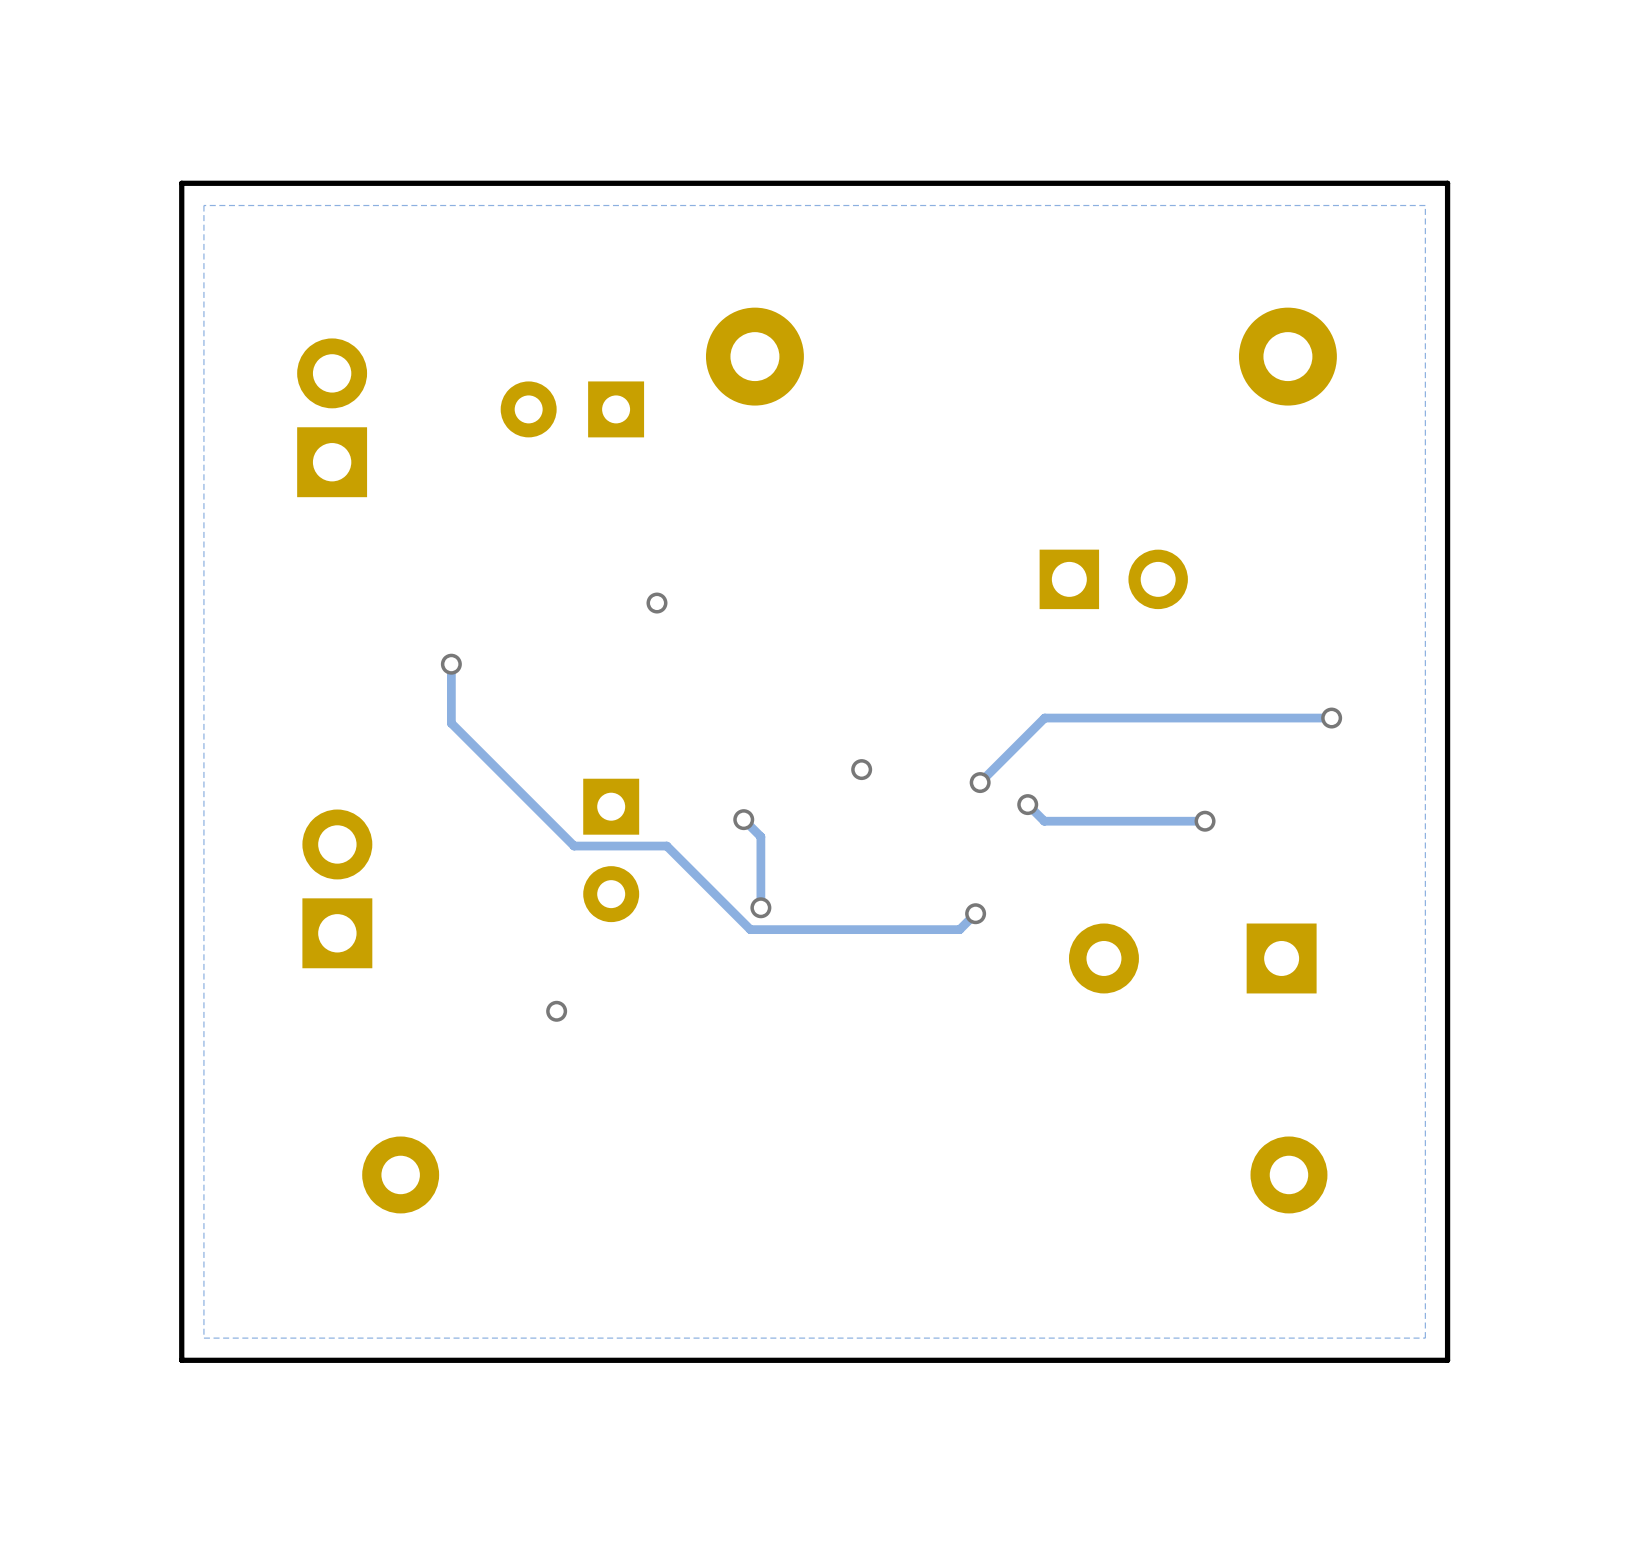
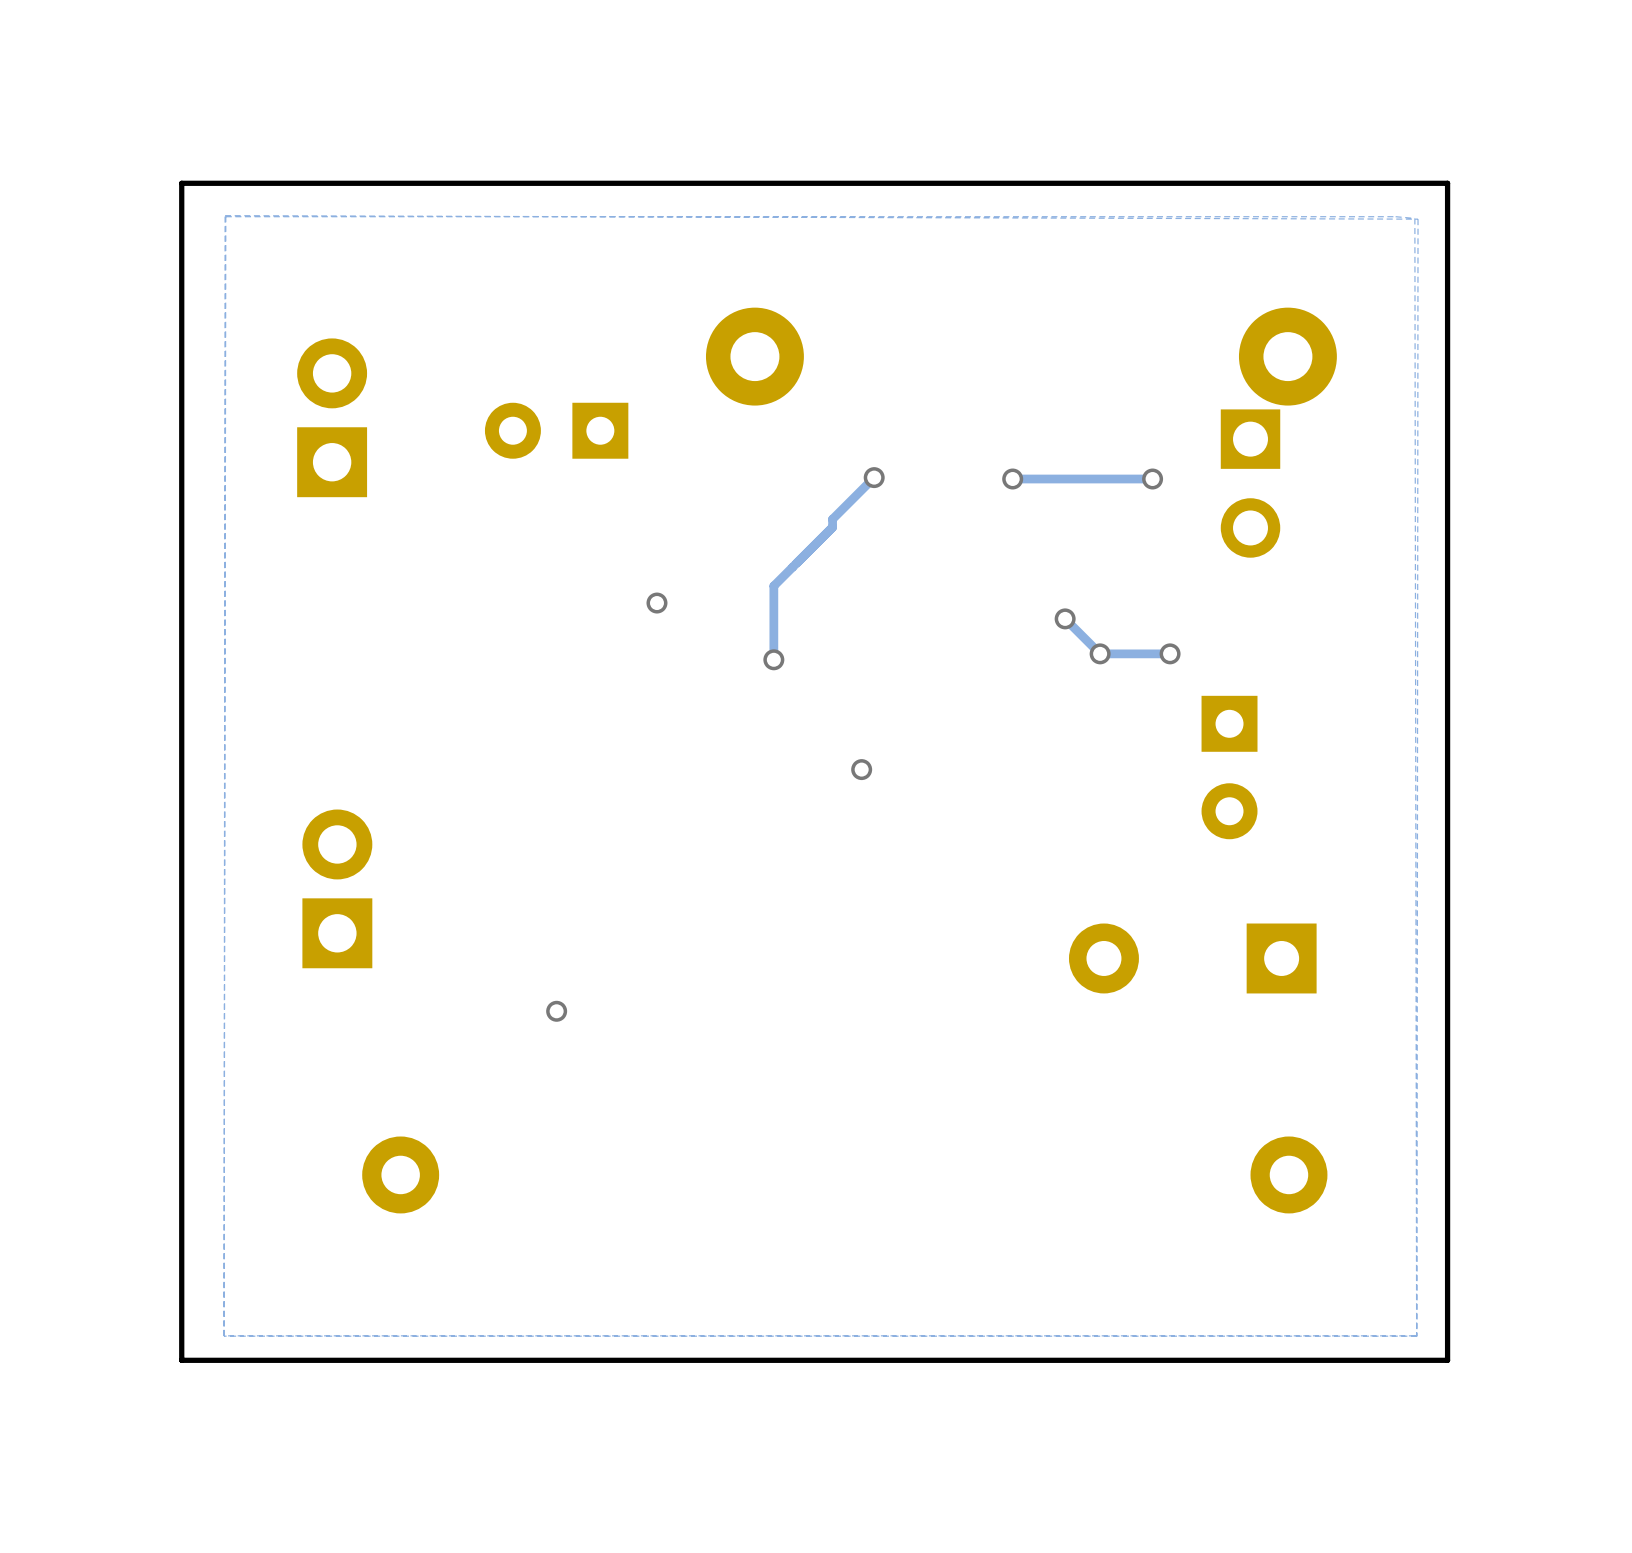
zone outline: (1425, 205) (1425, 1338) (203, 1338) (203, 205) (1425, 205) -> (1395, 216) (1414, 218) (1416, 1335) (224, 1335) (225, 216) (1395, 216)
zone outline: none -> (225, 215) (224, 1336) (1416, 1336) (1418, 219) (225, 215)
part position: (572, 409) -> (556, 430)
track: none -> (874, 477) (832, 519) (832, 527) (773, 586) (773, 659)
via: none -> (874, 477)
via: none -> (1012, 479)
track: none -> (1152, 479) (1012, 479)
via: none -> (1152, 479)
part rotation: 0° (1113, 579) -> 90° clockwise (1250, 483)
part position: (1113, 579) -> (1250, 483)
track: none -> (1065, 618) (1100, 653) (1170, 653)
via: none -> (1065, 618)
via: none -> (1100, 653)
via: none -> (1170, 653)
via: none -> (773, 659)
track: (451, 664) (451, 723) (574, 846) (666, 846) (750, 929) (959, 929) (975, 913) -> none
via: (451, 664) -> none
track: (1331, 718) (1044, 718) (980, 782) -> none
via: (1331, 718) -> none
via: (980, 782) -> none
track: (1027, 804) (1044, 821) (1205, 821) -> none
via: (1027, 804) -> none
track: (743, 819) (760, 836) (760, 907) -> none
via: (743, 819) -> none
via: (1205, 821) -> none
part position: (611, 850) -> (1229, 767)
via: (760, 907) -> none
via: (975, 913) -> none

